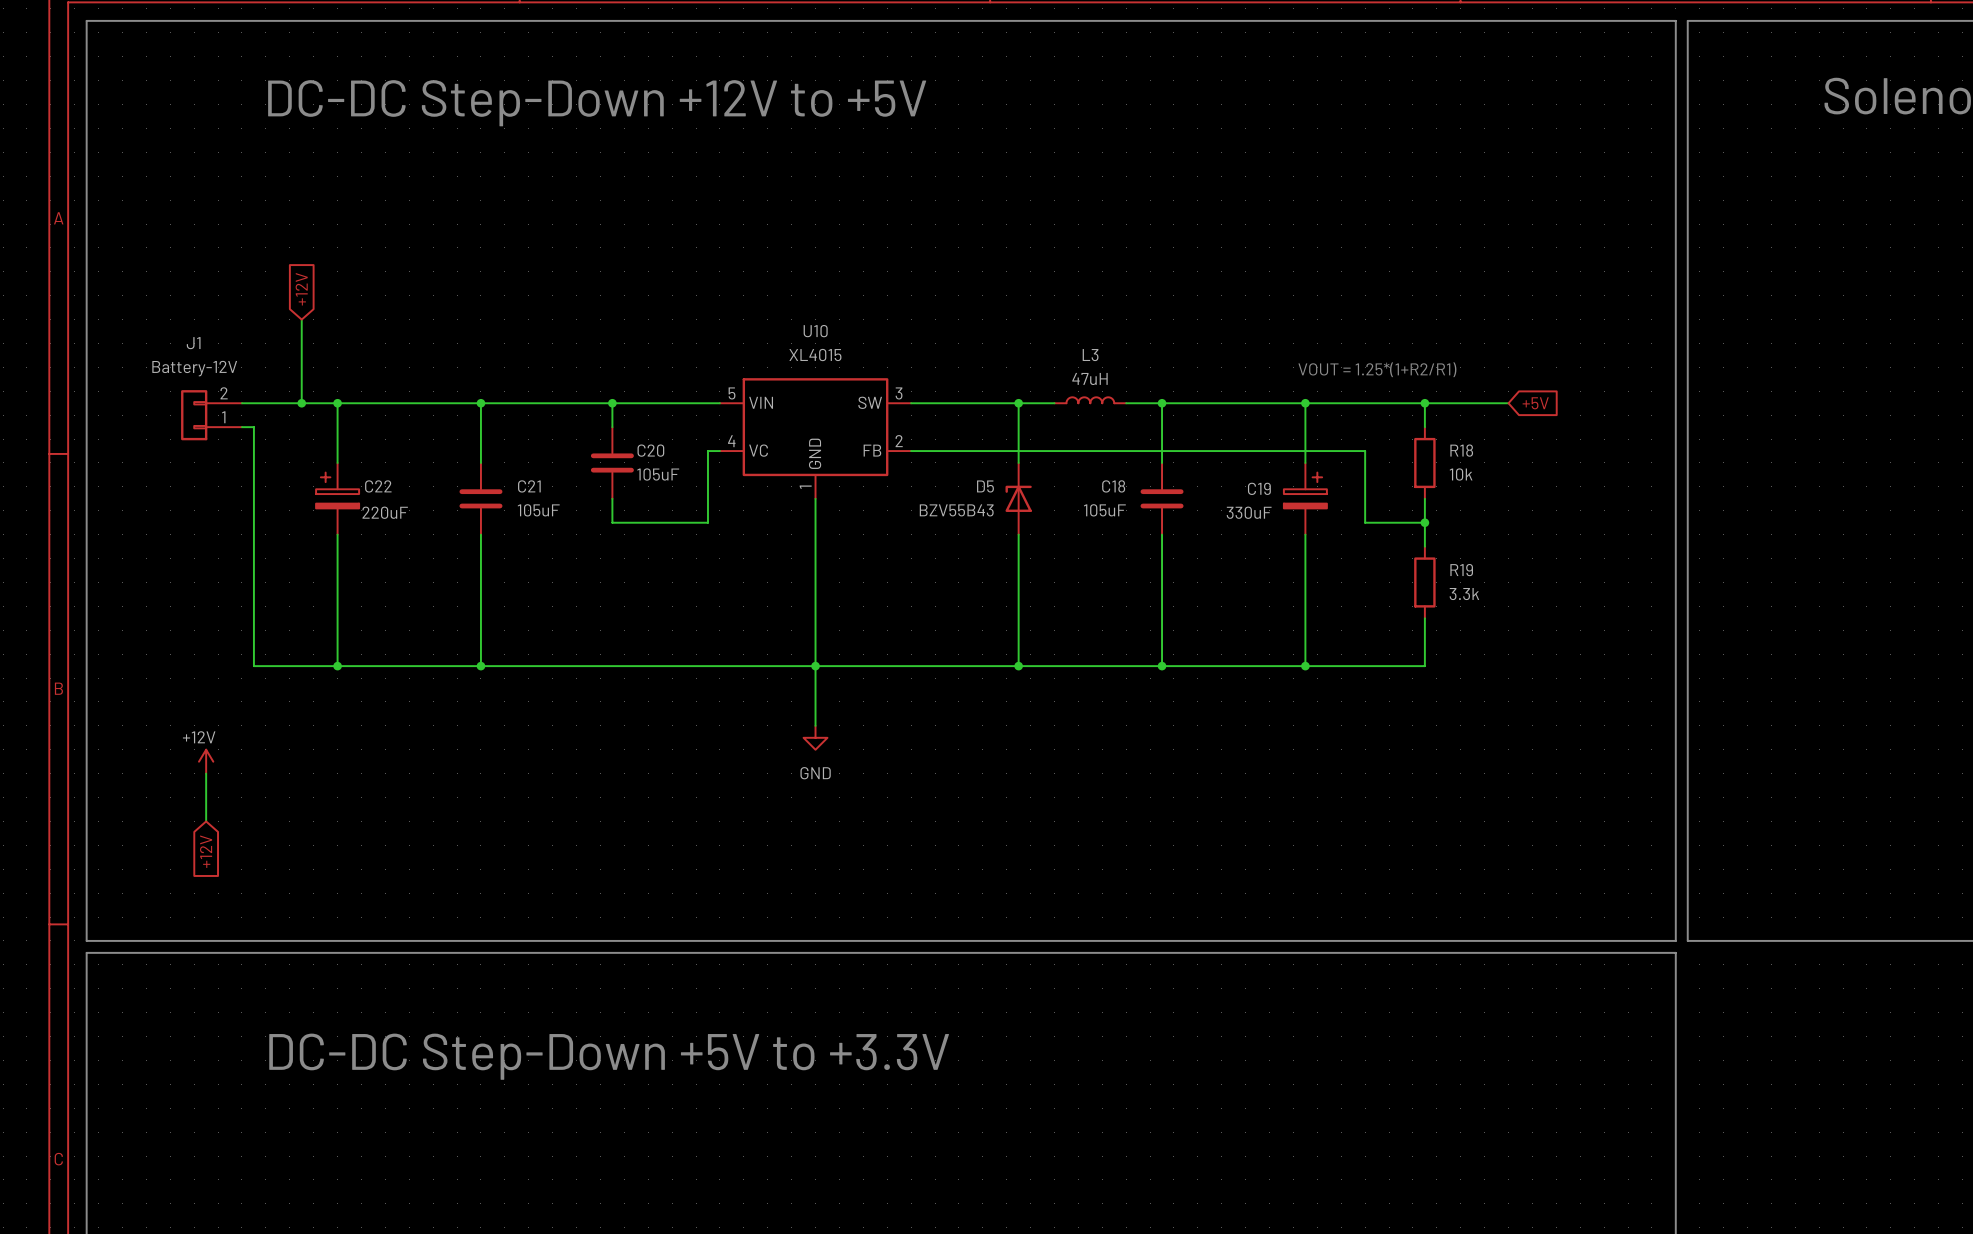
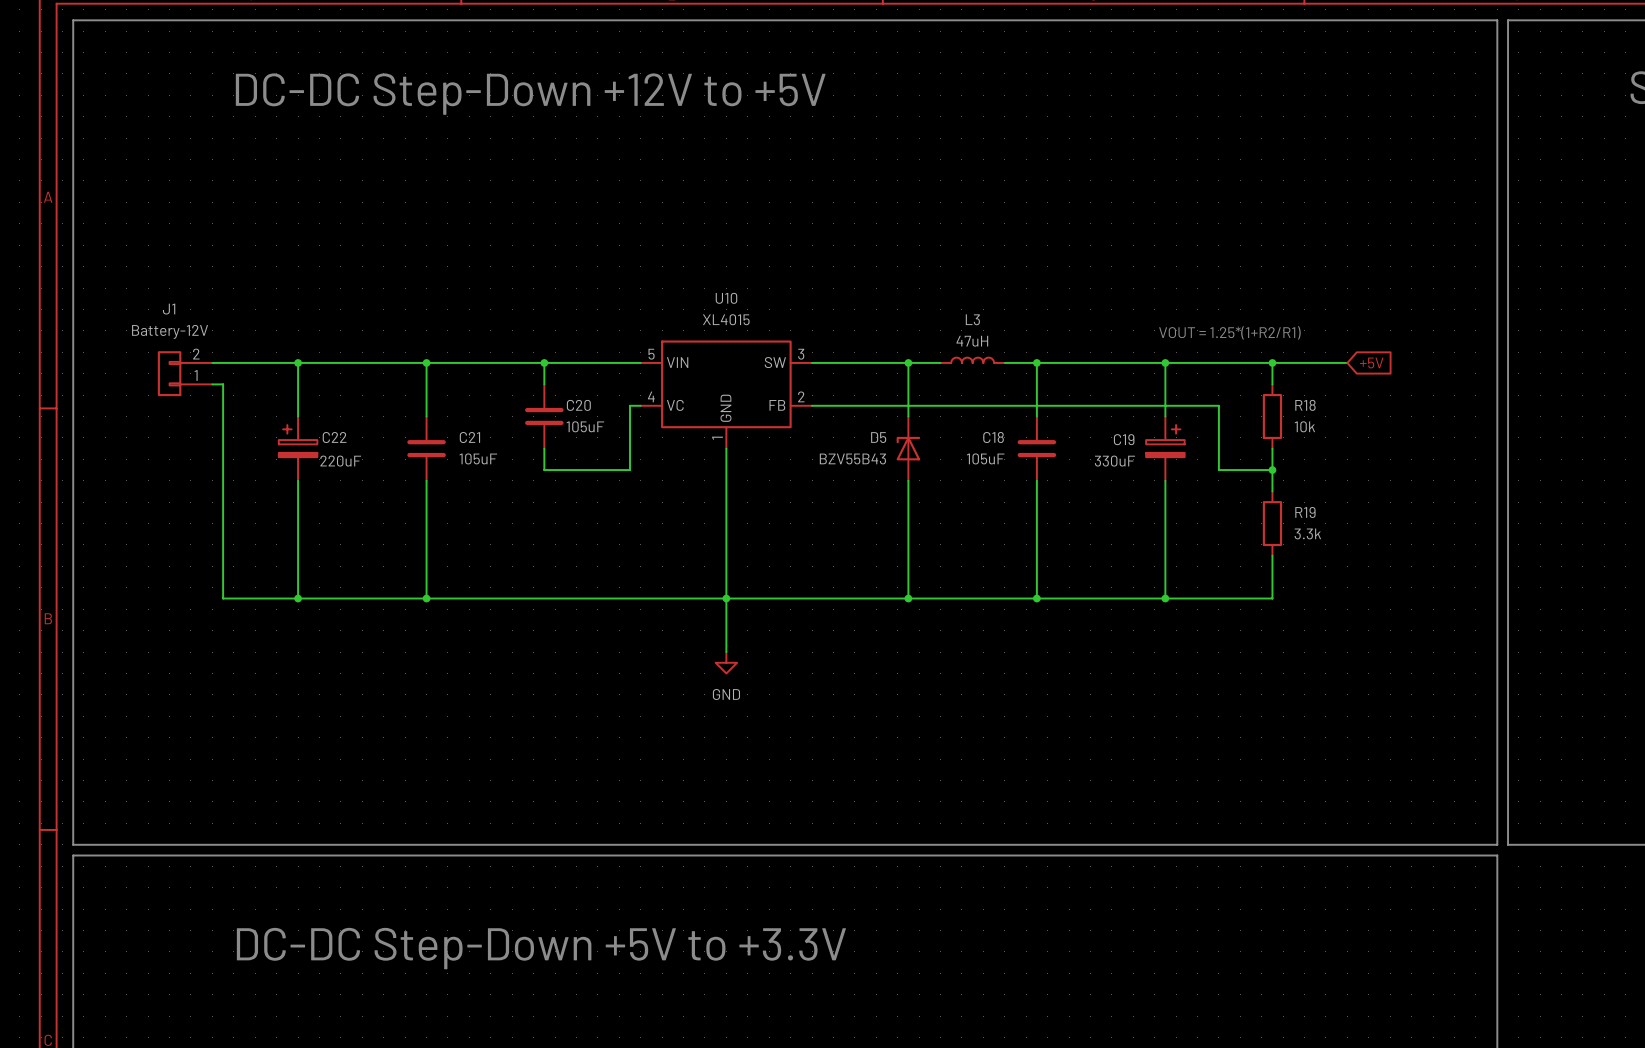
global label: +12V (301, 289) -> none
wire: (301, 319) (301, 403) -> none
junction: (301, 403) -> none
power symbol: +12V (206, 761) -> none
wire: (206, 773) (206, 821) -> none
global label: +12V (206, 851) -> none

